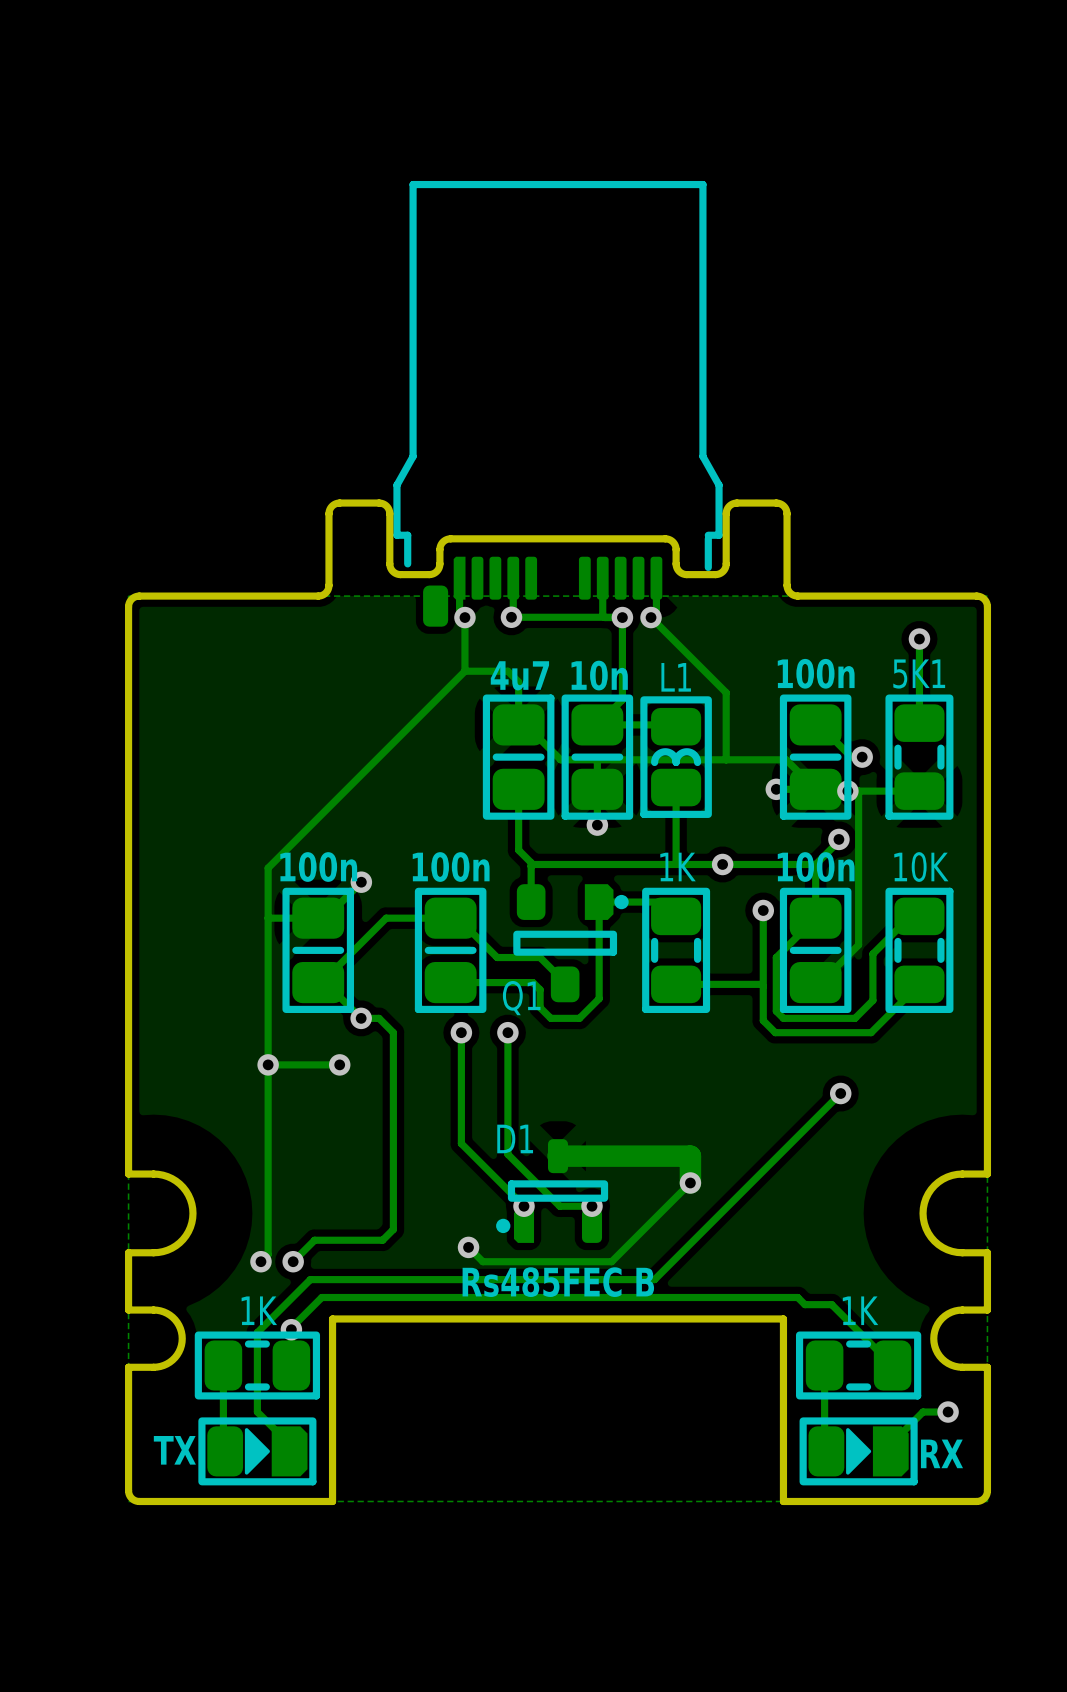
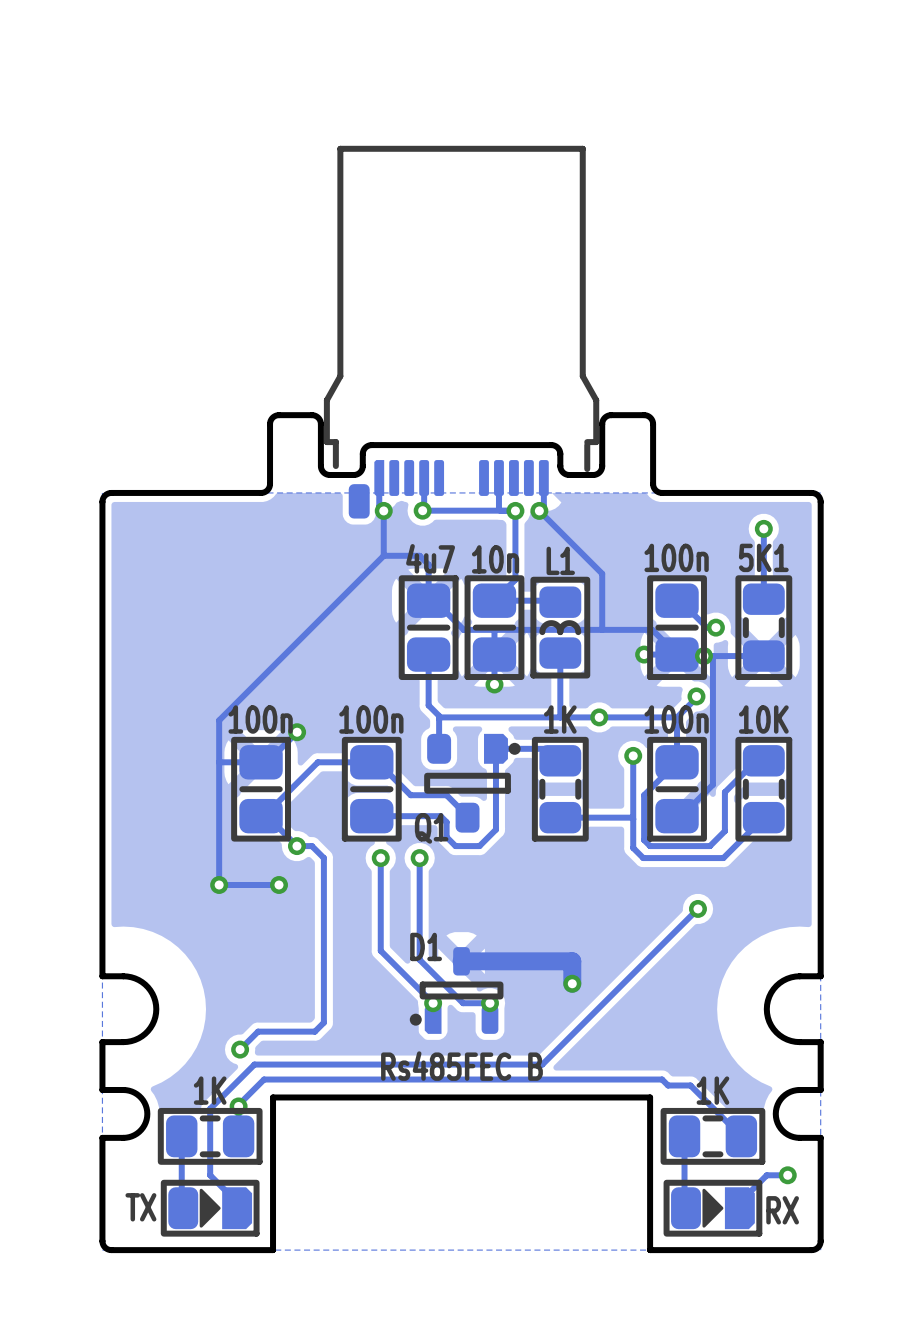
track: (268, 1064) (268, 1254) (260, 1261) -> none
track: (690, 1182) (611, 1261) (482, 1261) (468, 1247) -> none
via: (468, 1247) -> none
via: (260, 1261) -> none

